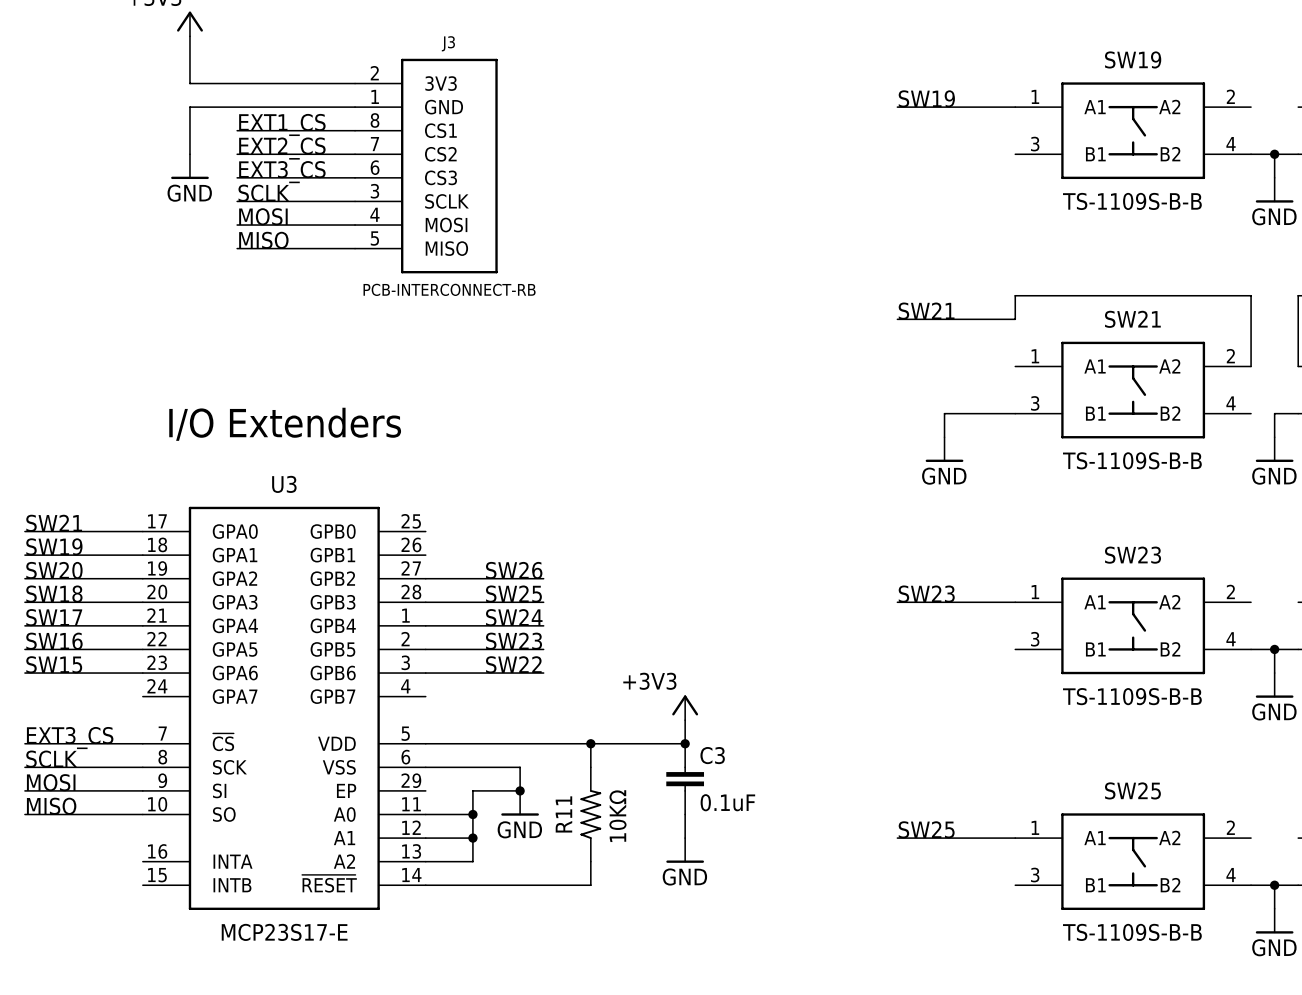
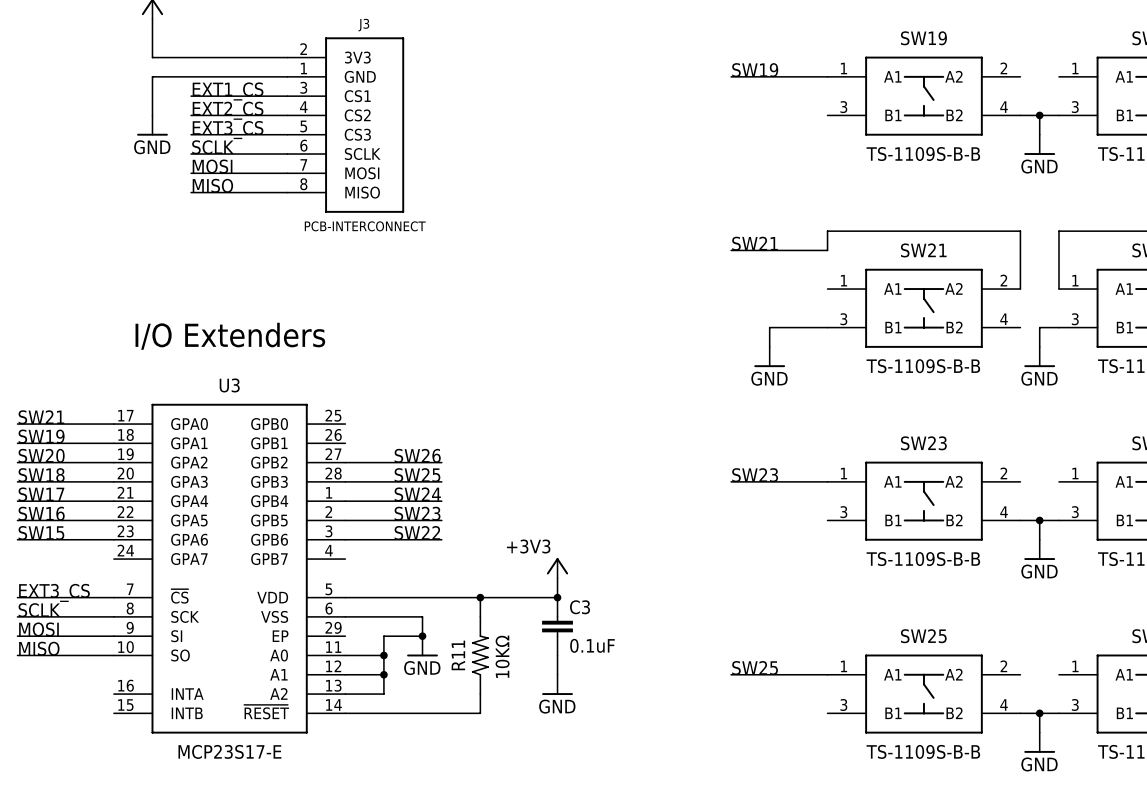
J3 pin number: 8 (375, 120) -> 3 (303, 87)
J3 pin number: 7 (374, 144) -> 4 (303, 107)
J3 pin number: 6 (375, 167) -> 5 (303, 126)
J3 pin number: 3 (374, 191) -> 6 (303, 145)
J3 pin number: 4 (374, 214) -> 7 (303, 164)
J3 pin number: 5 (374, 238) -> 8 (303, 184)
J3 value: PCB-INTERCONNECT-RB (449, 289) -> PCB-INTERCONNECT (365, 226)

